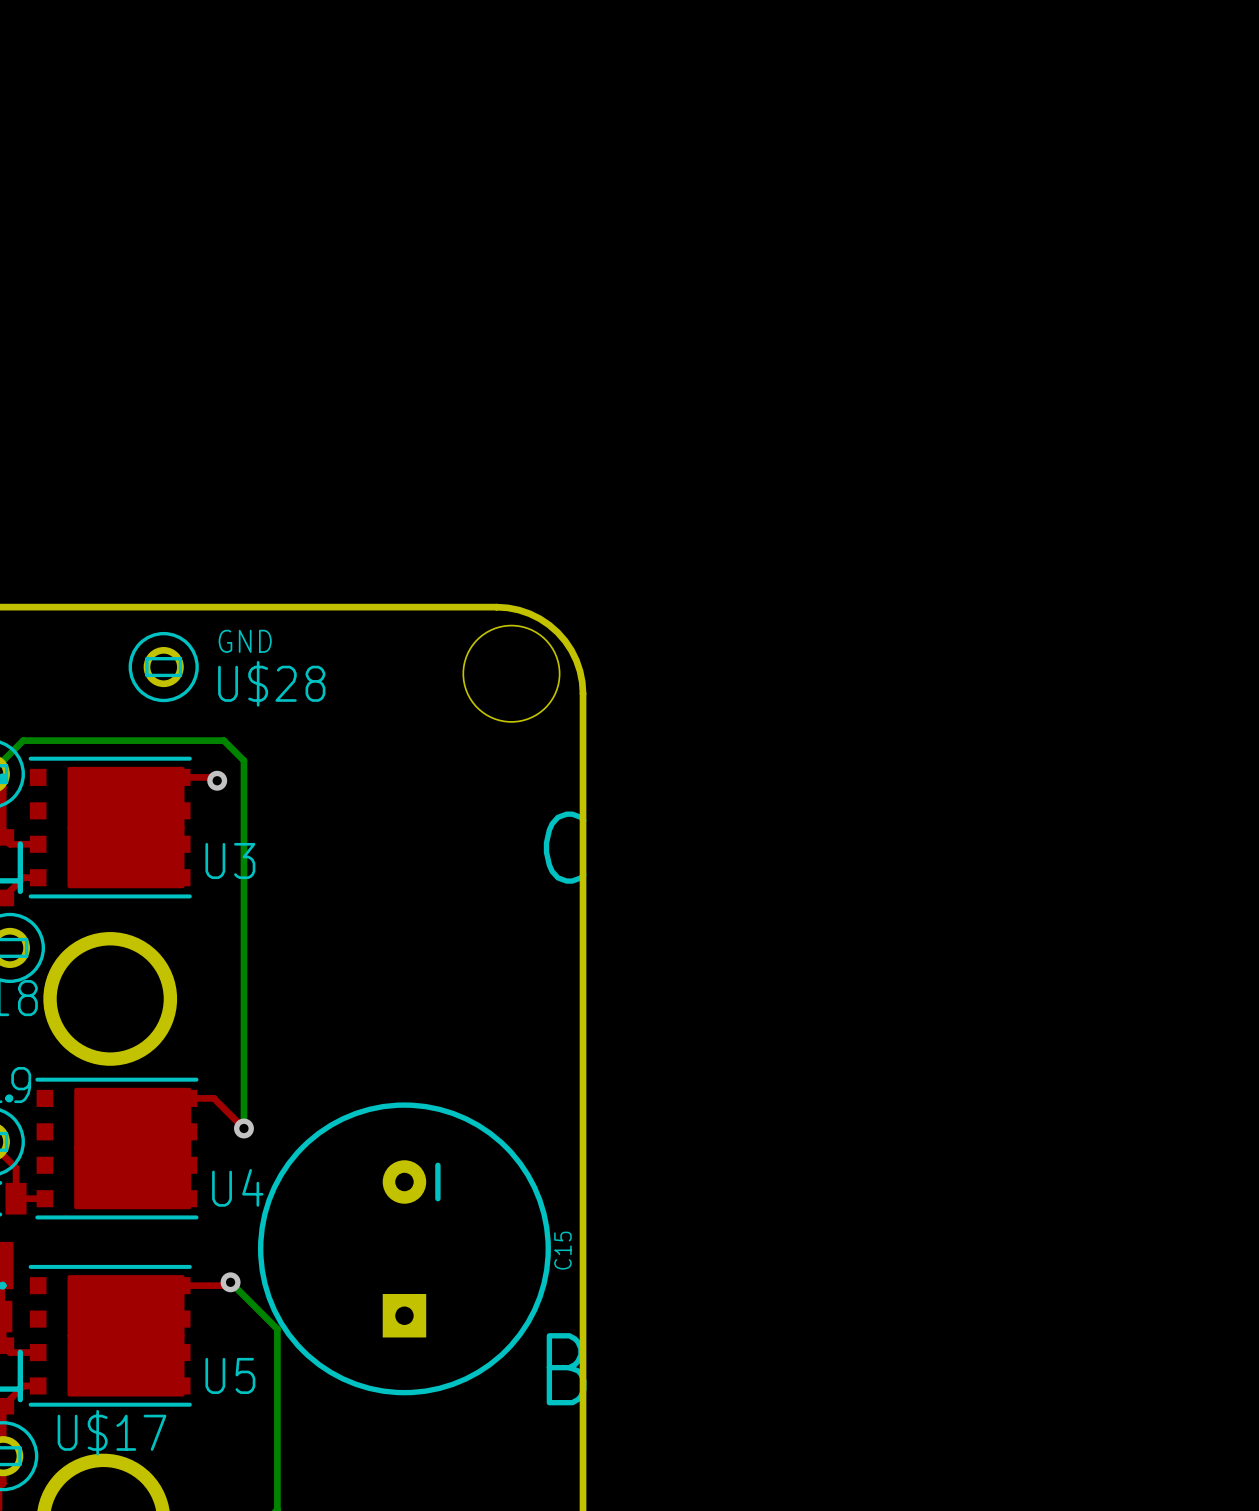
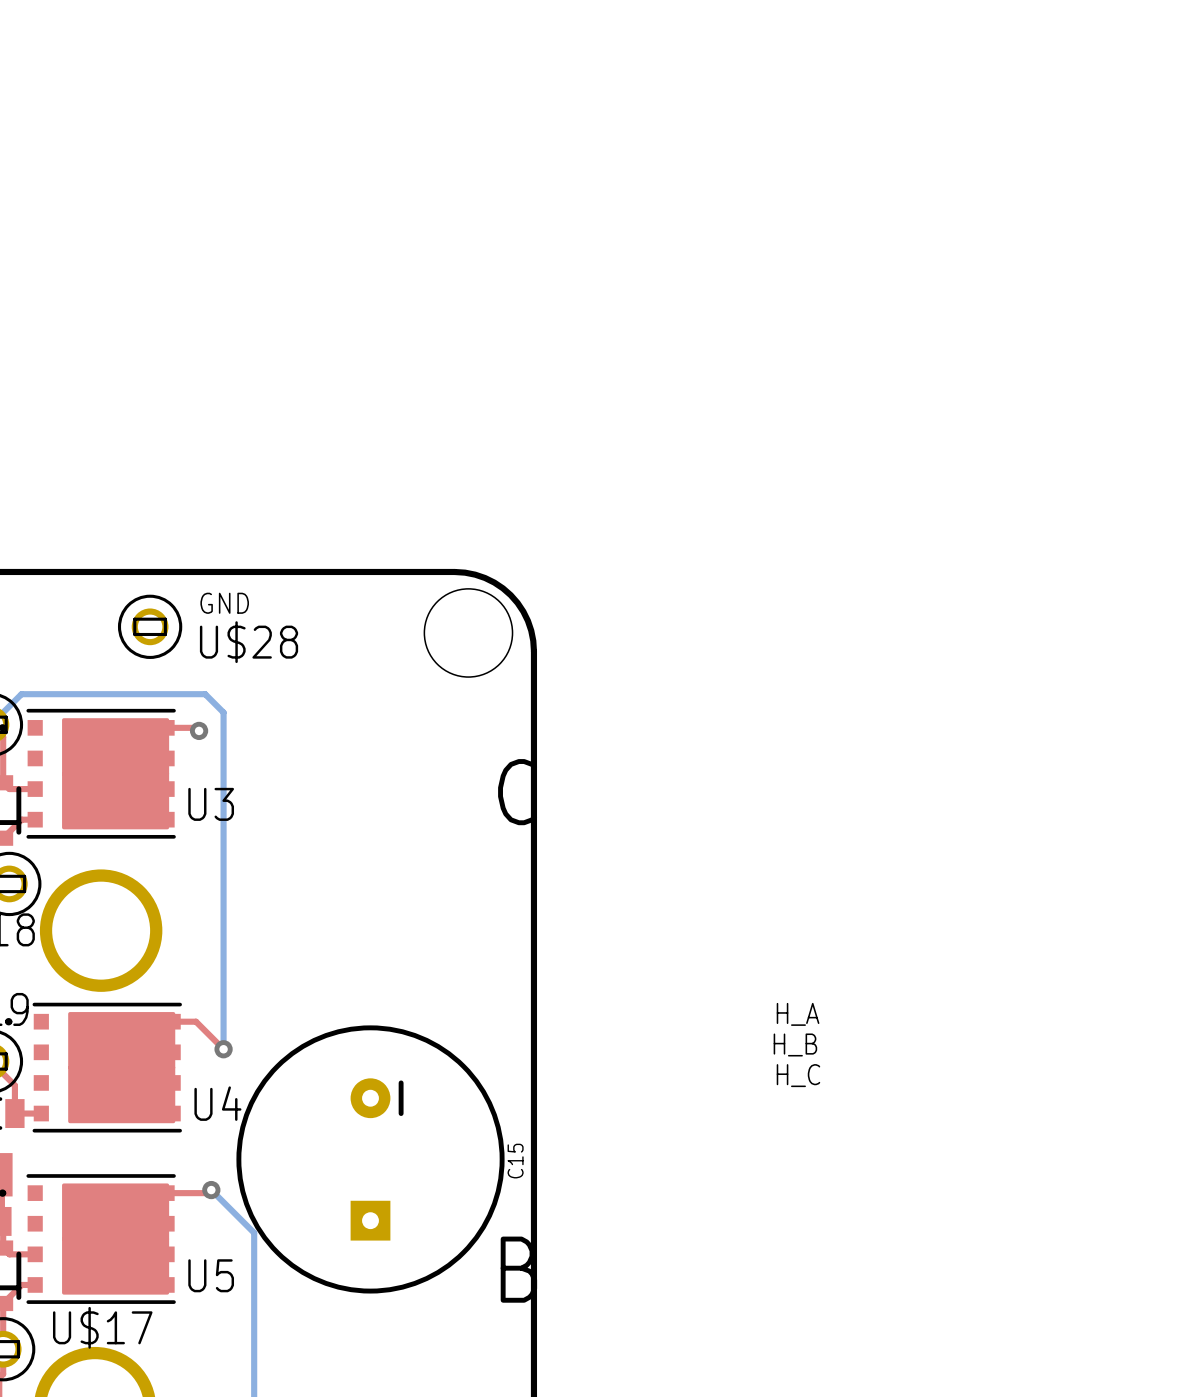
text: none -> H_A (798, 1014)
text: none -> H_B (795, 1044)
text: none -> H_C (798, 1075)

